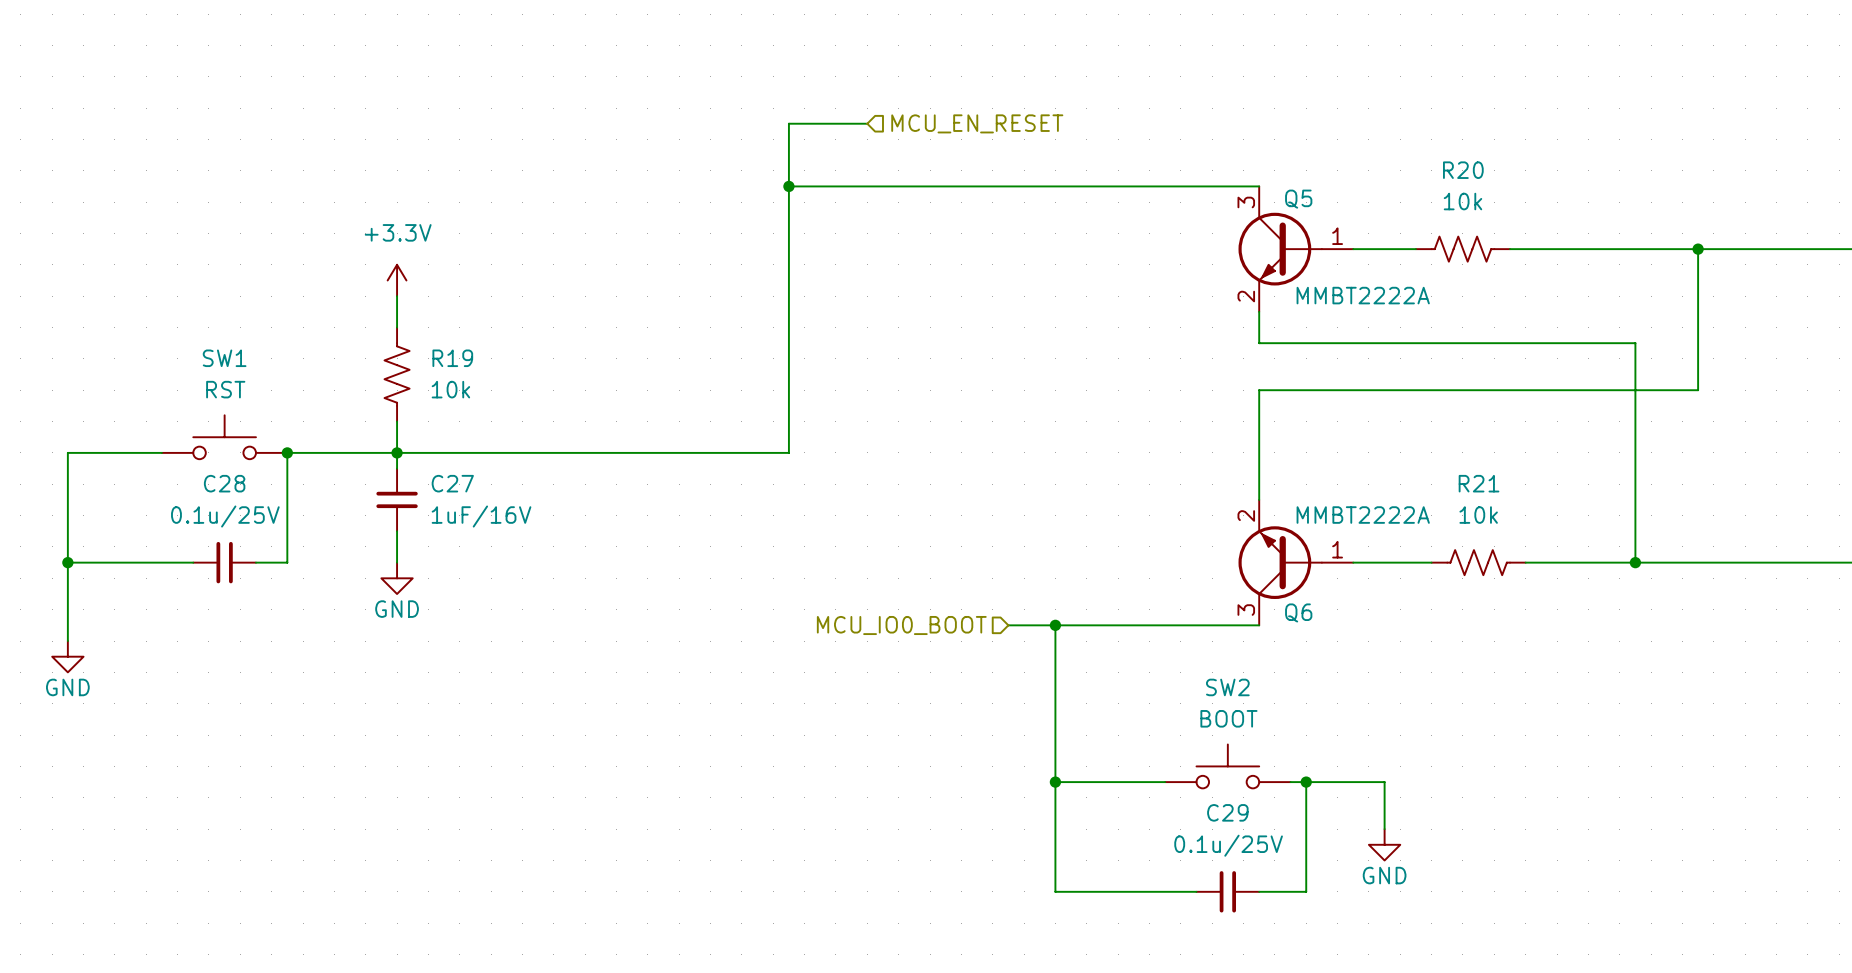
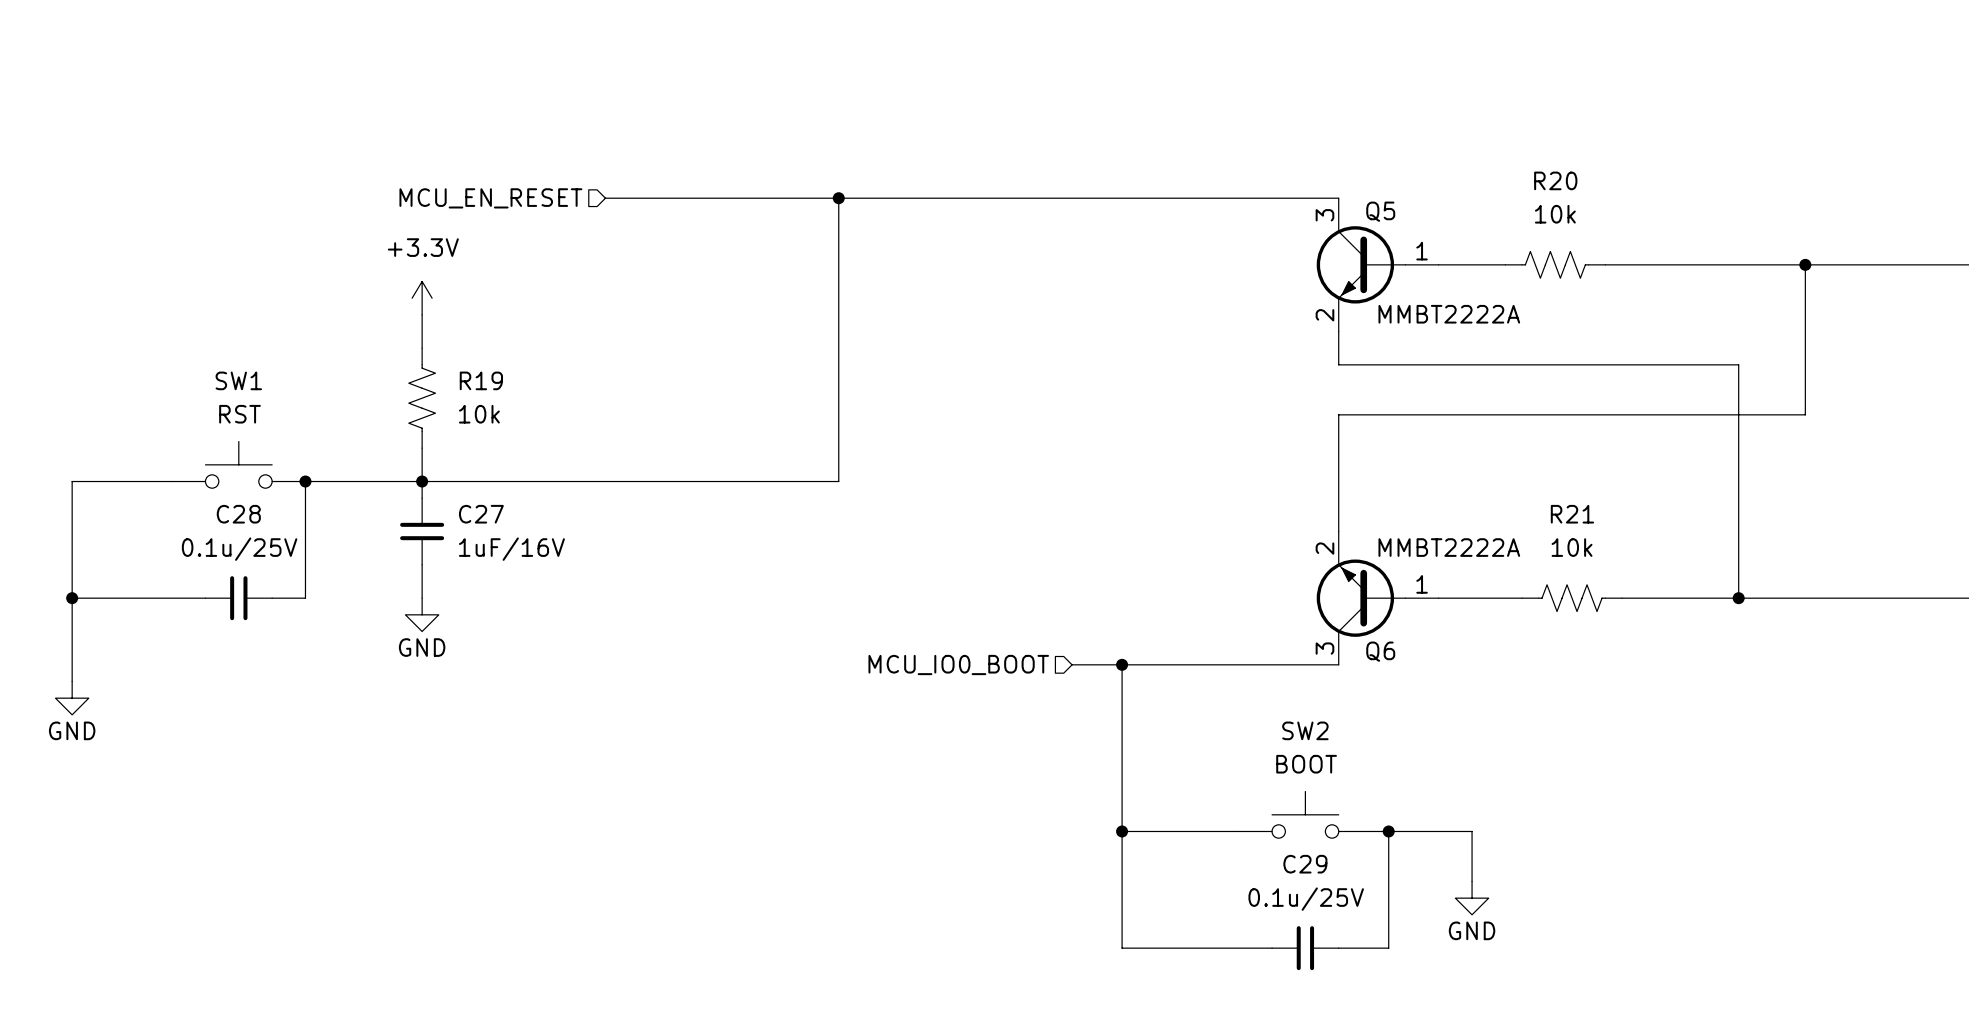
wire: (867, 123) (788, 123) (788, 186) -> (605, 198) (838, 198)
hierarchical label: MCU_EN_RESET (977, 123) -> none
hierarchical label: none -> MCU_EN_RESET (490, 198)

